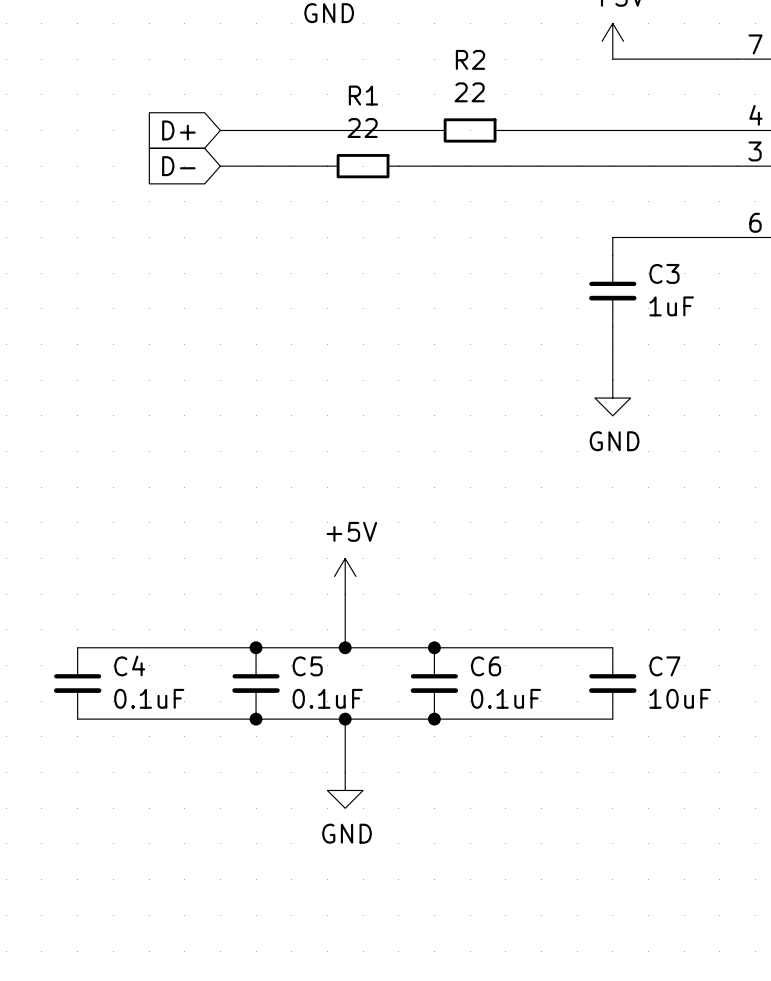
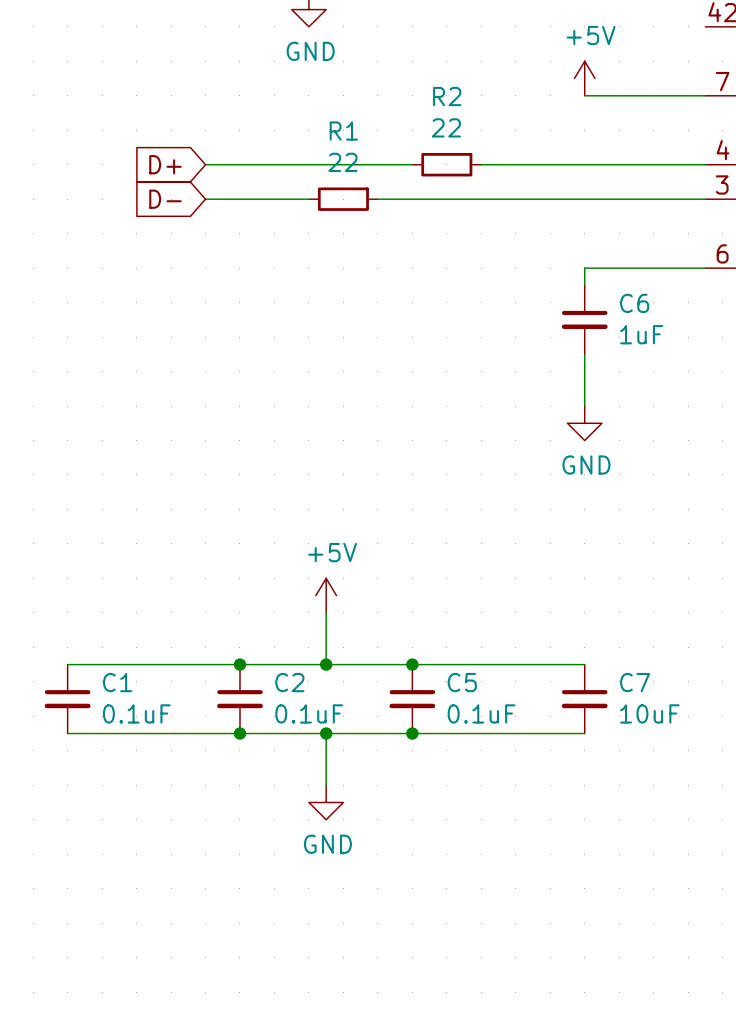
C3 name: C3 (664, 273) -> C6 (634, 303)
C4 name: C4 (129, 665) -> C1 (117, 682)
C5 name: C5 (307, 666) -> C2 (289, 682)
C6 name: C6 (486, 666) -> C5 (462, 682)

